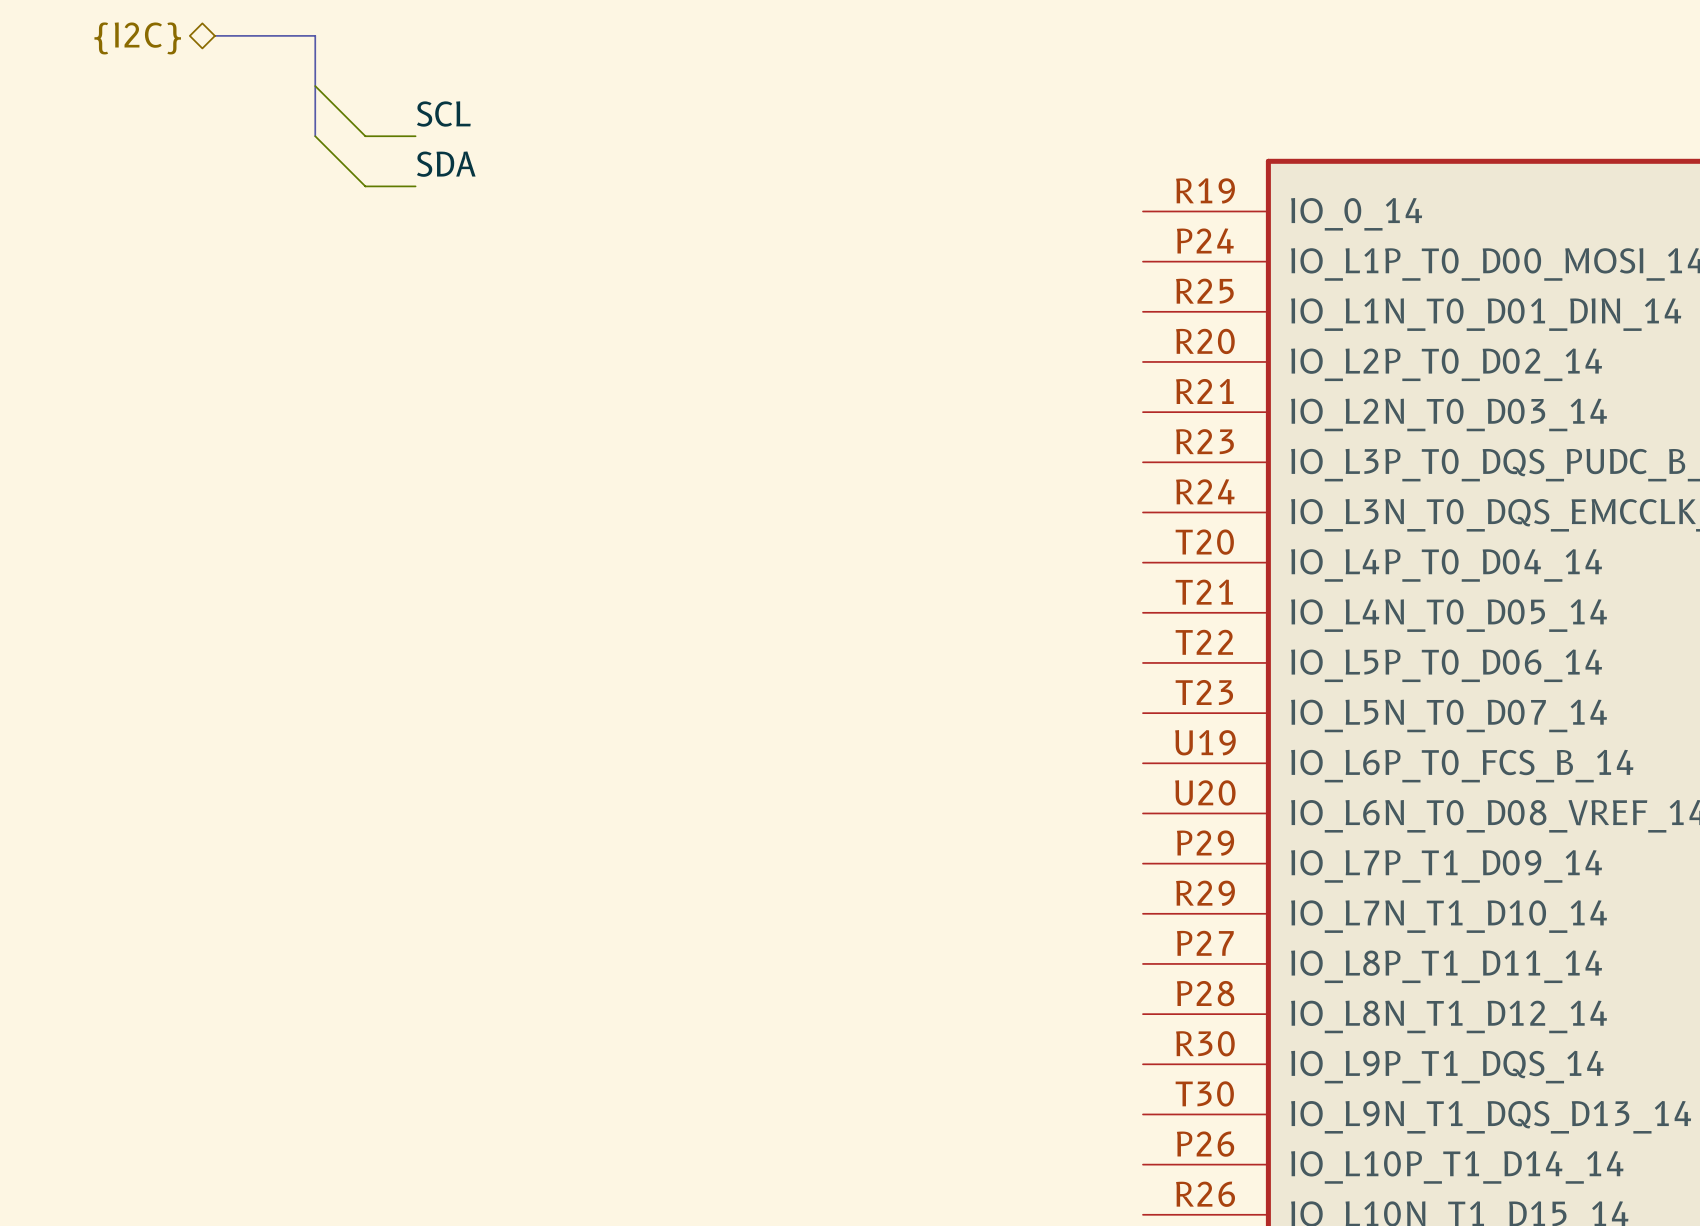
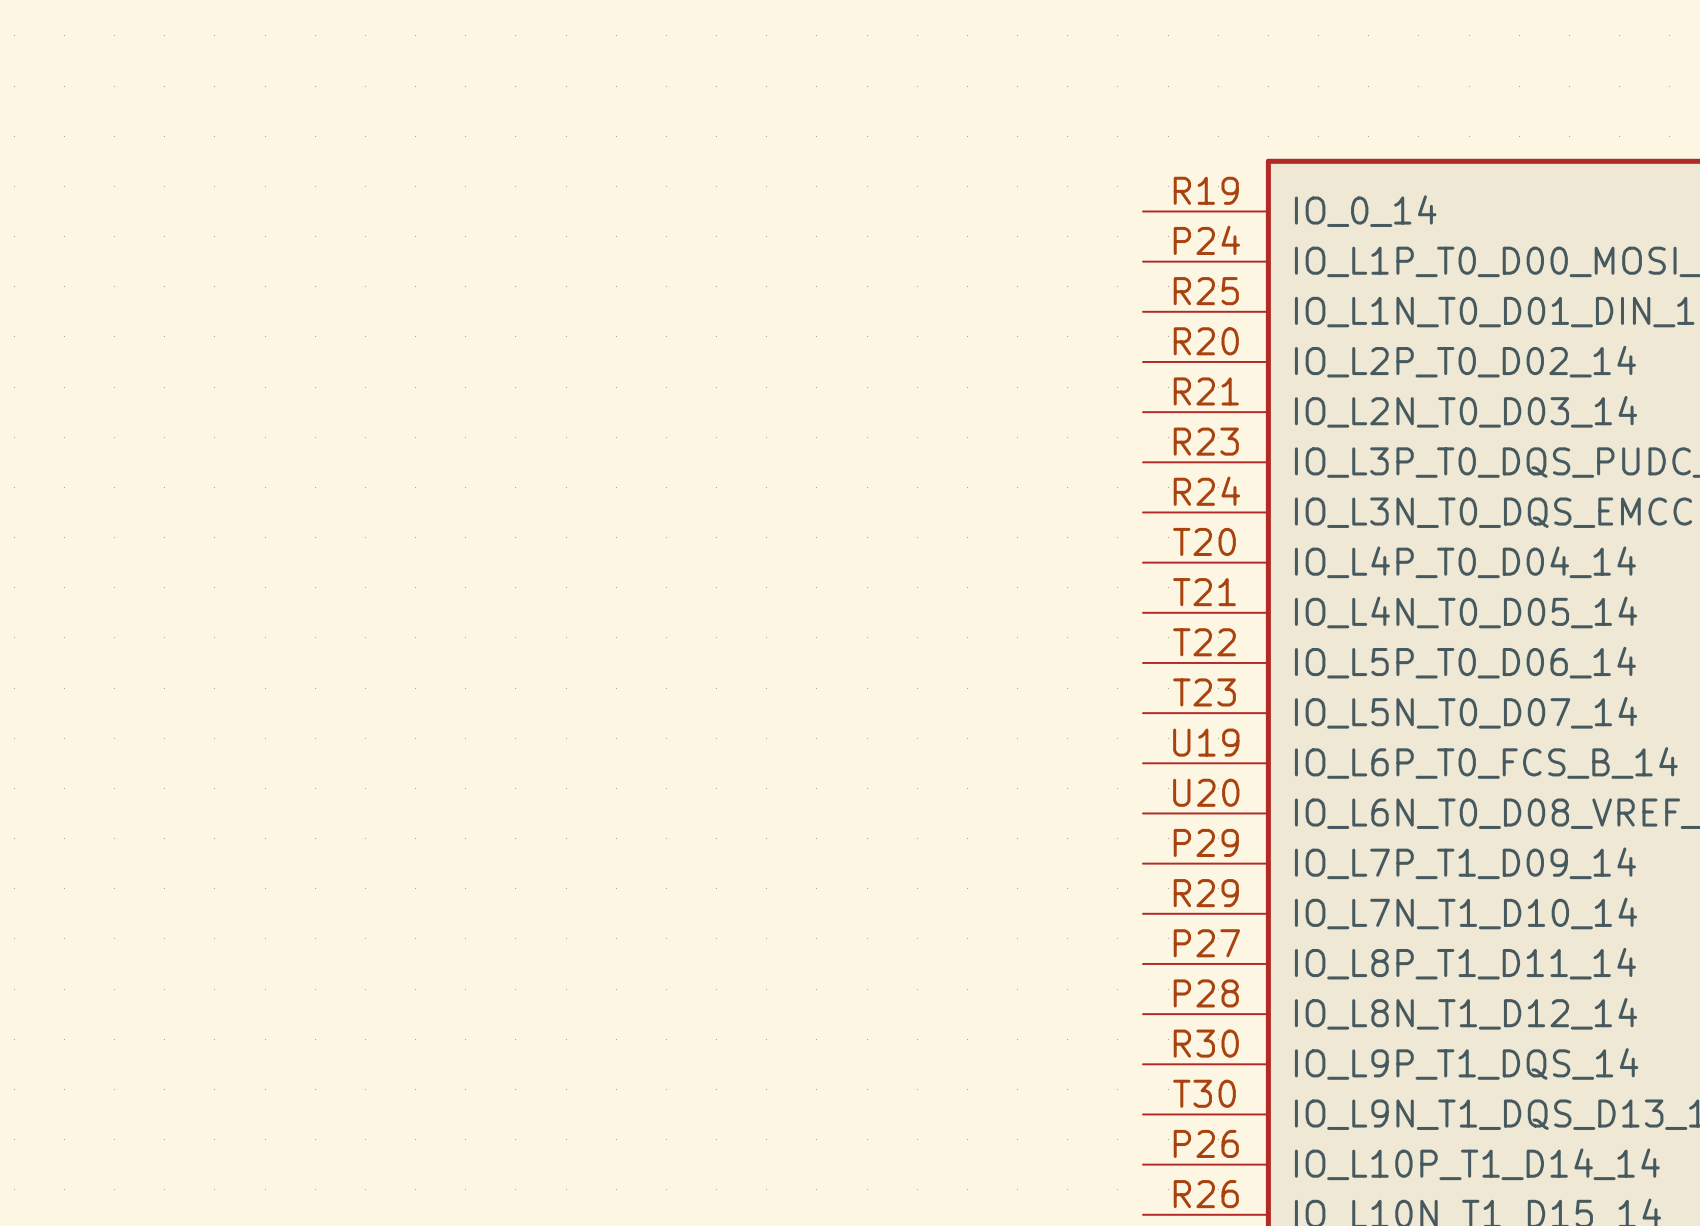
bus: (214, 35) (315, 35) (315, 136) -> none
hierarchical label: {I2C} (137, 38) -> none
wire: (315, 86) (365, 136) (415, 136) -> none
label: SCL (443, 113) -> none
wire: (315, 136) (365, 186) (415, 186) -> none
label: SDA (446, 164) -> none

